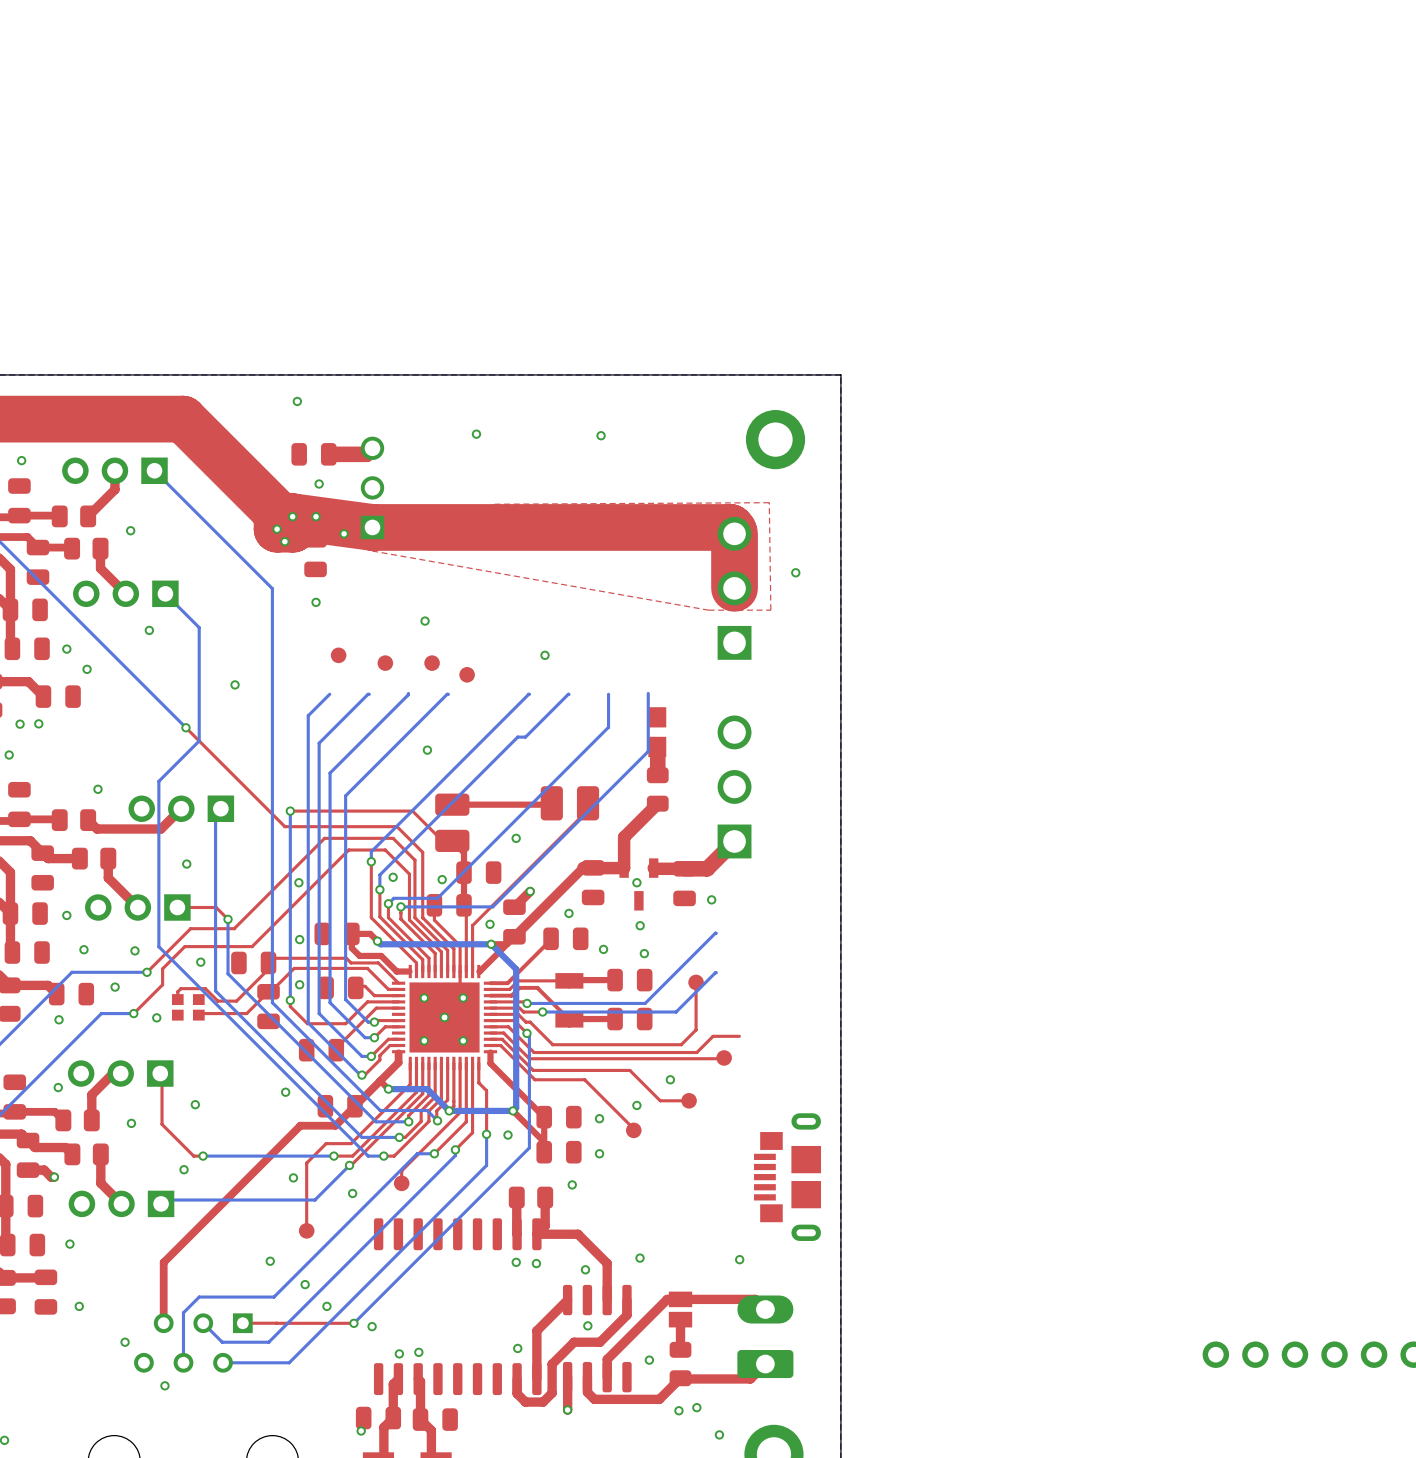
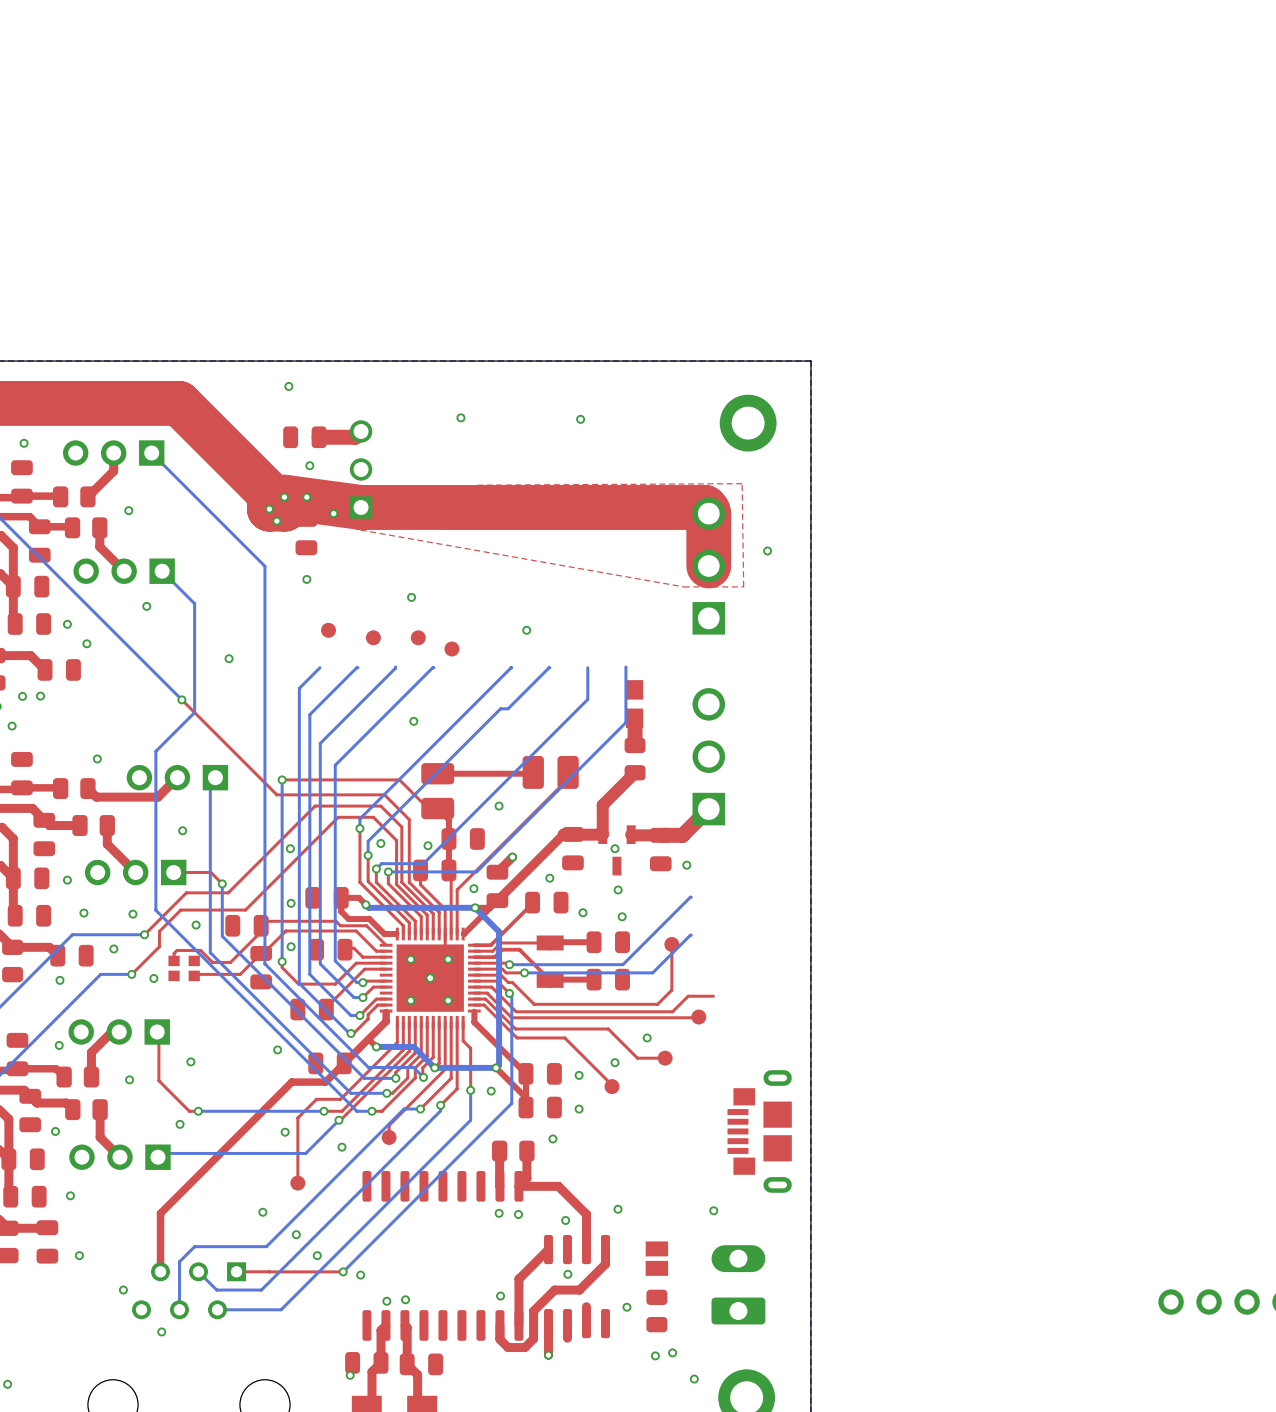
top track: (28, 1170) (44, 1170) (51, 1177) (54, 1177) -> none
top track: (765, 1309) (755, 1299) (667, 1299) (607, 1359) -> none
top track: (680, 1319) (680, 1349) -> none
top track: (765, 1364) (750, 1378) (680, 1378) (659, 1399) (594, 1399) (587, 1392) -> none

